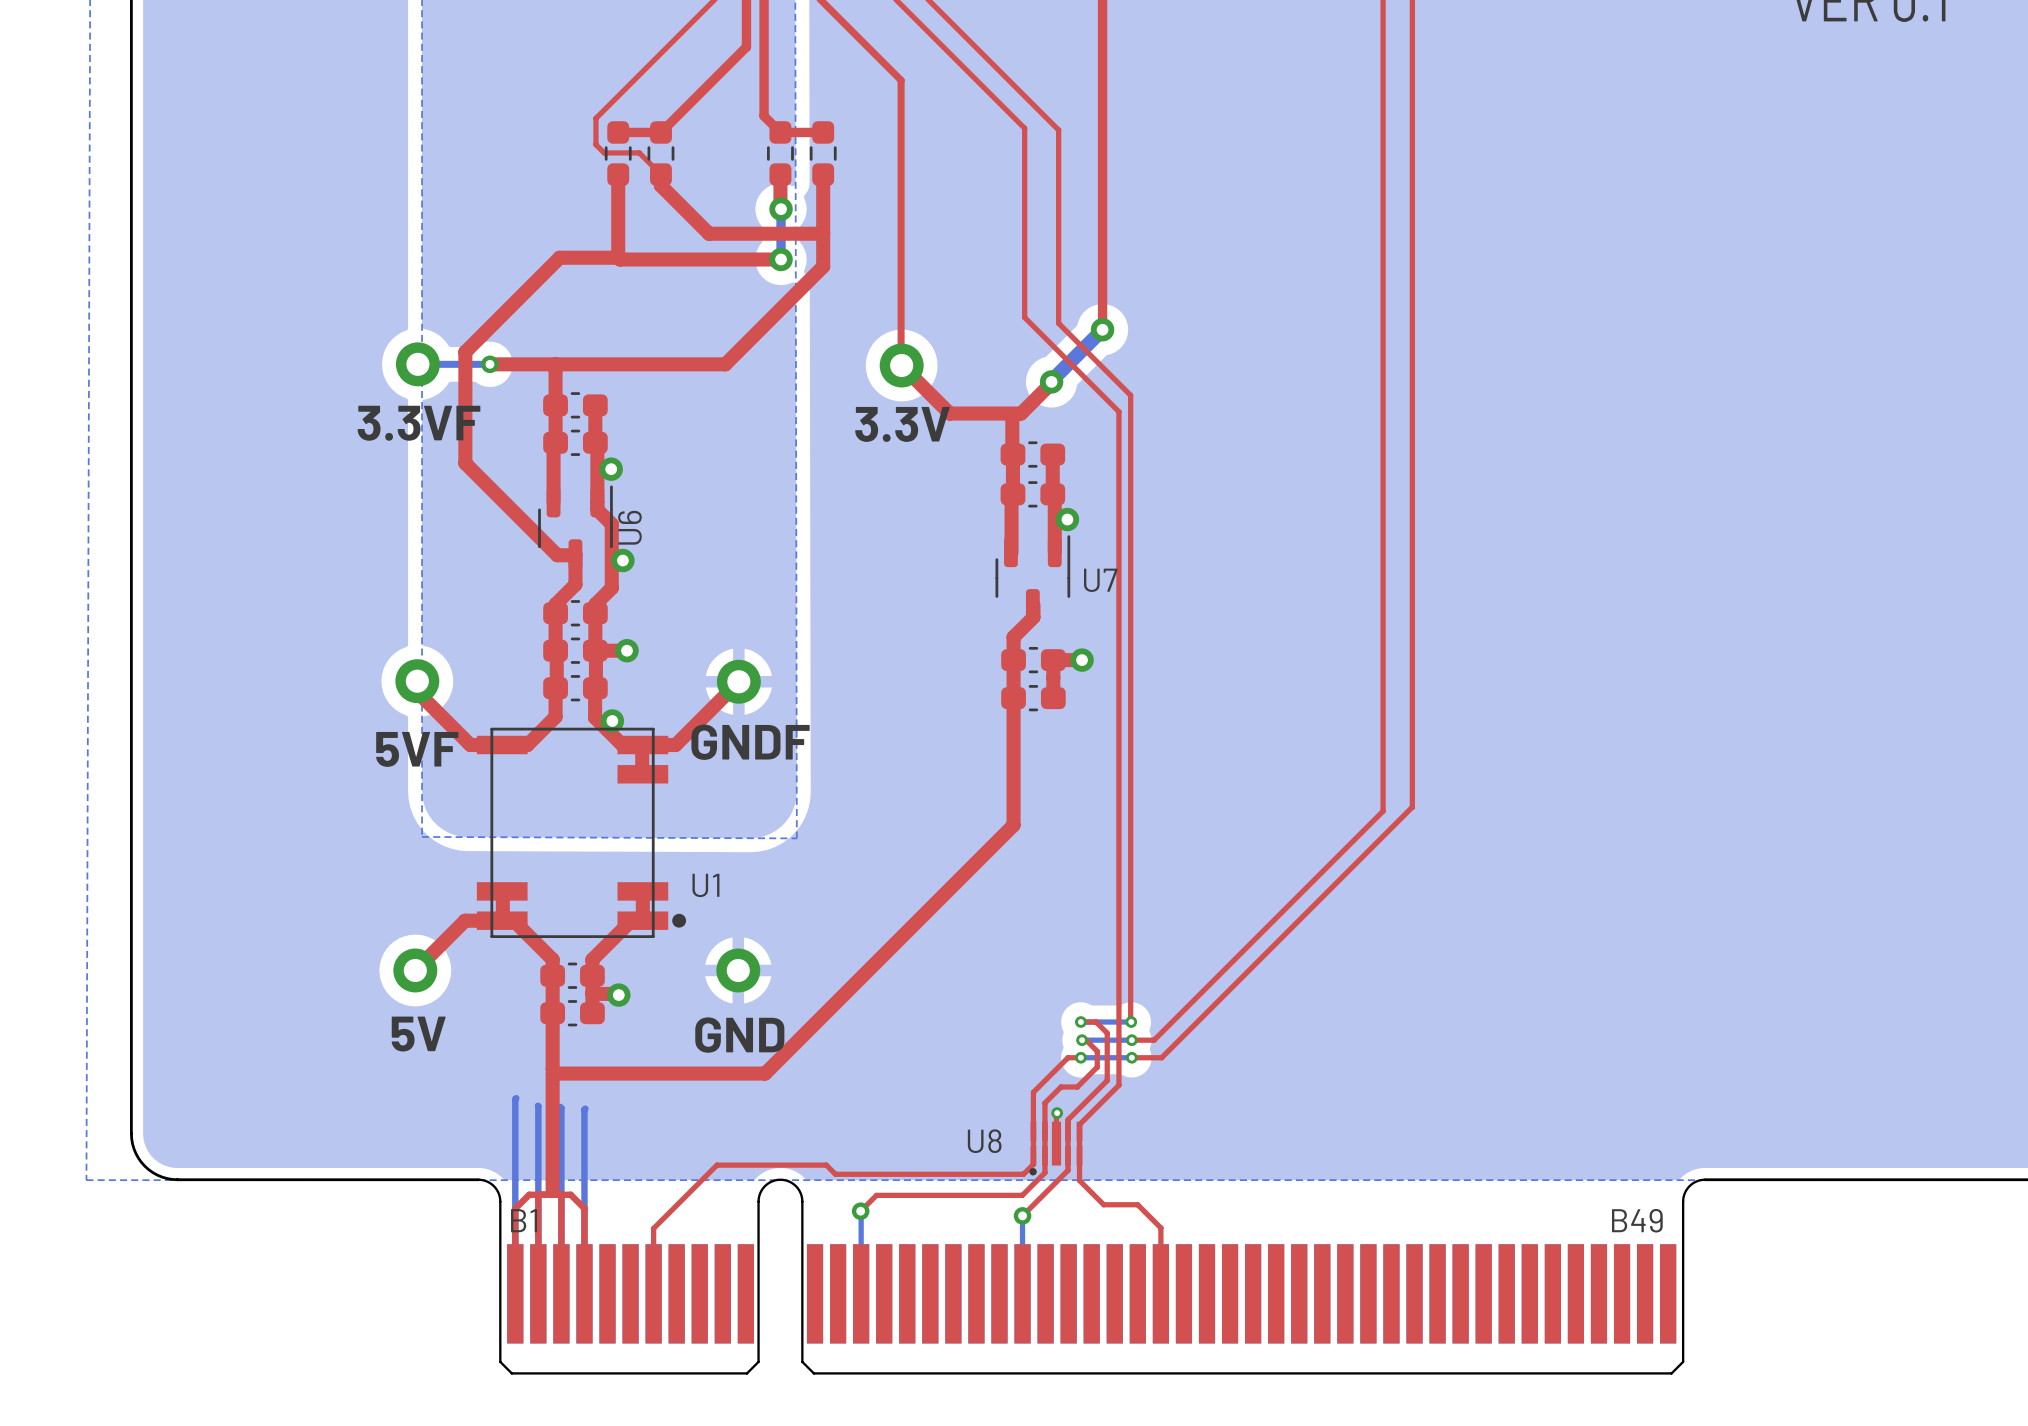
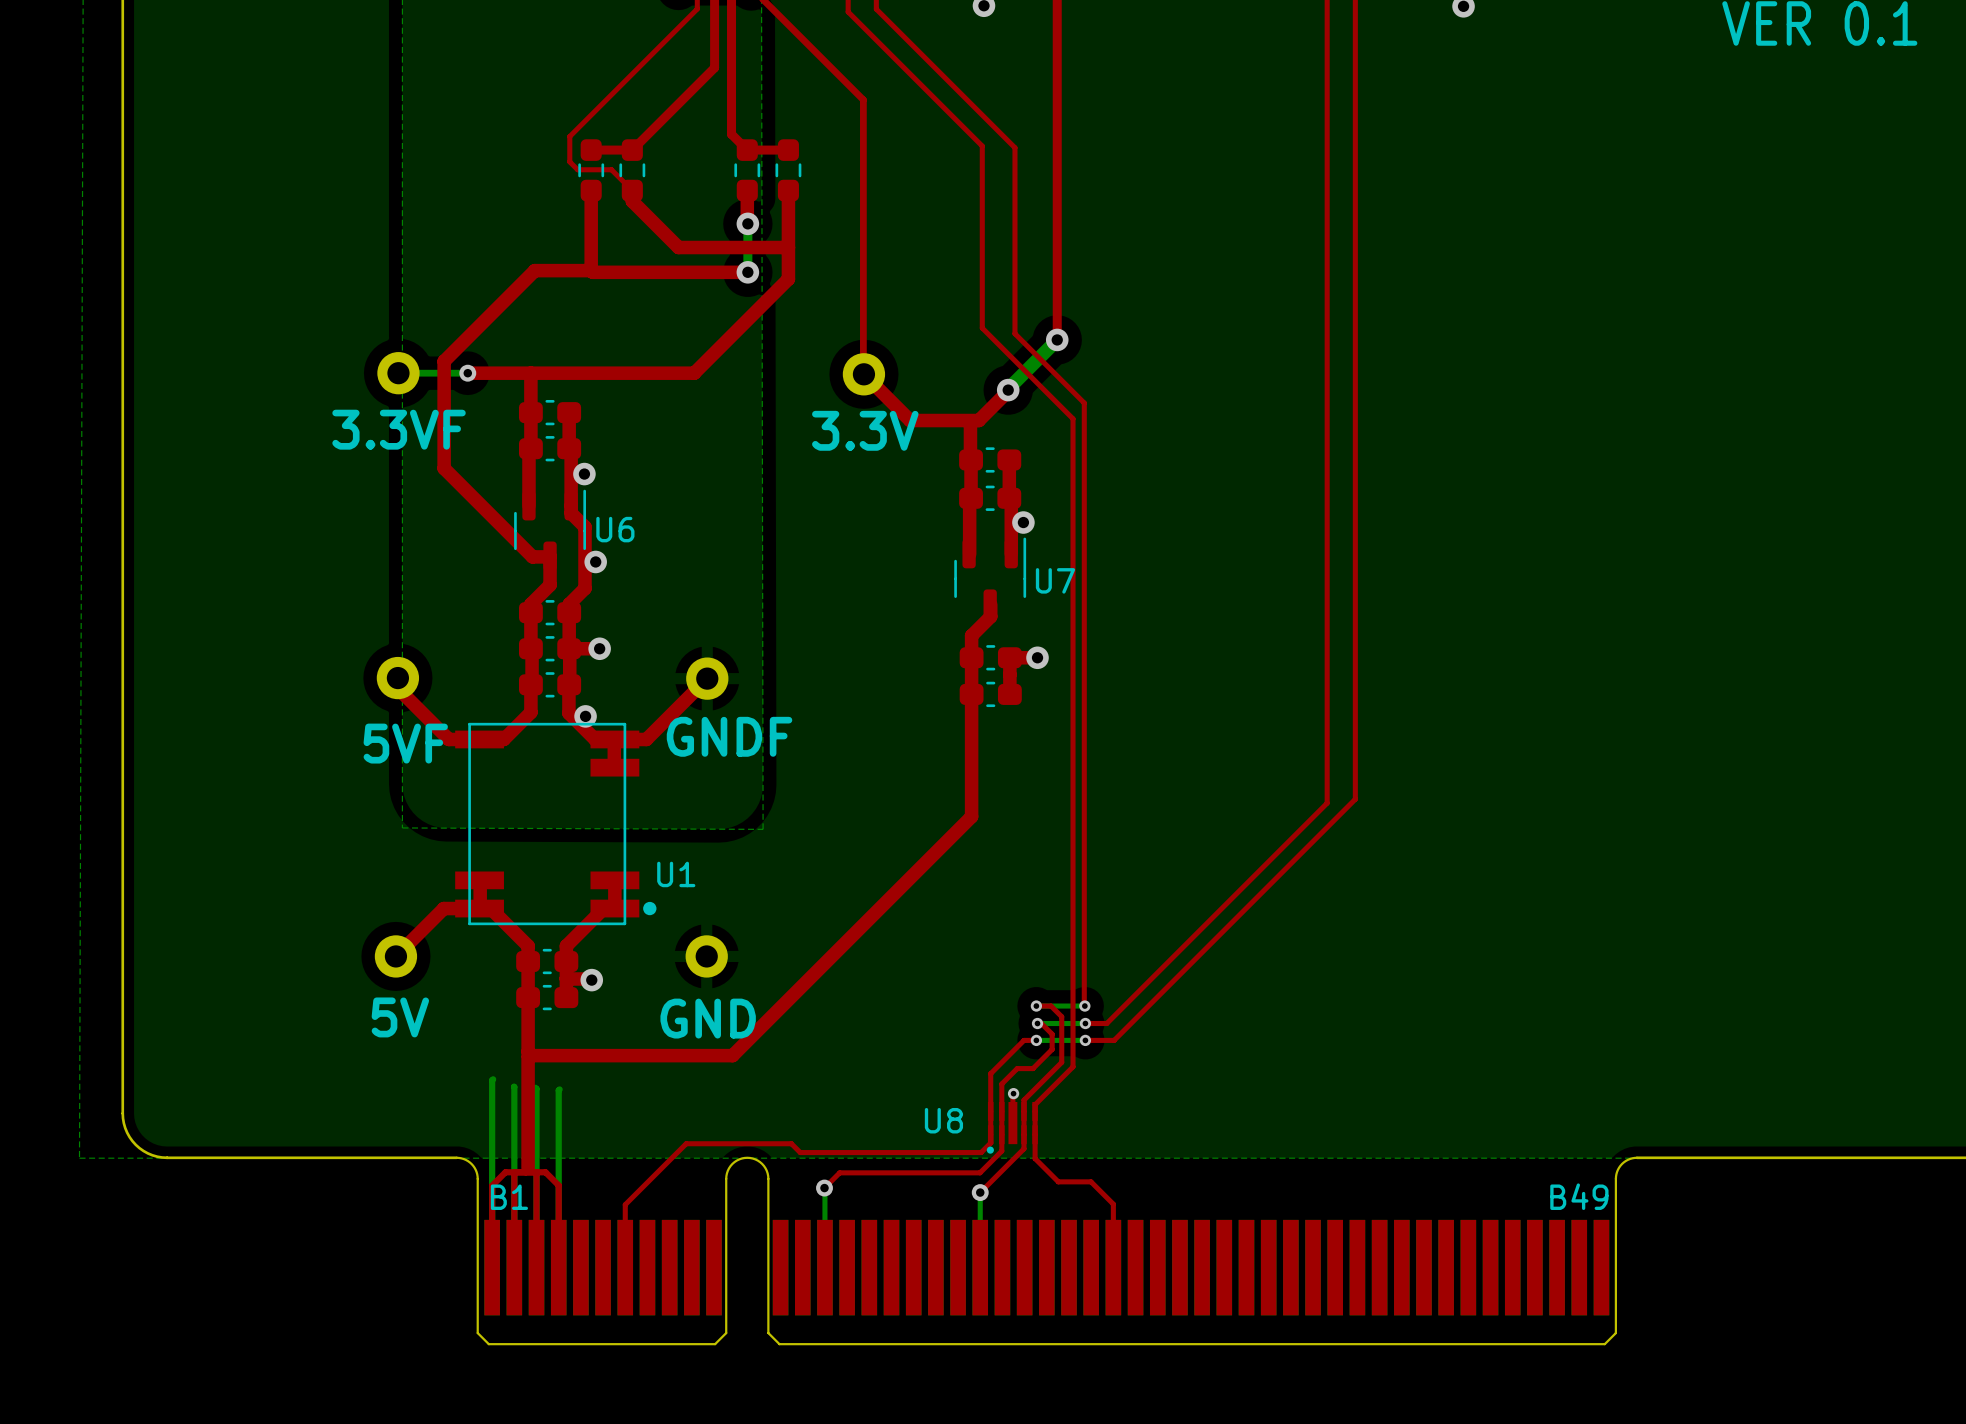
U6 name rotation: 0° (629, 527) -> 90° clockwise (615, 529)

